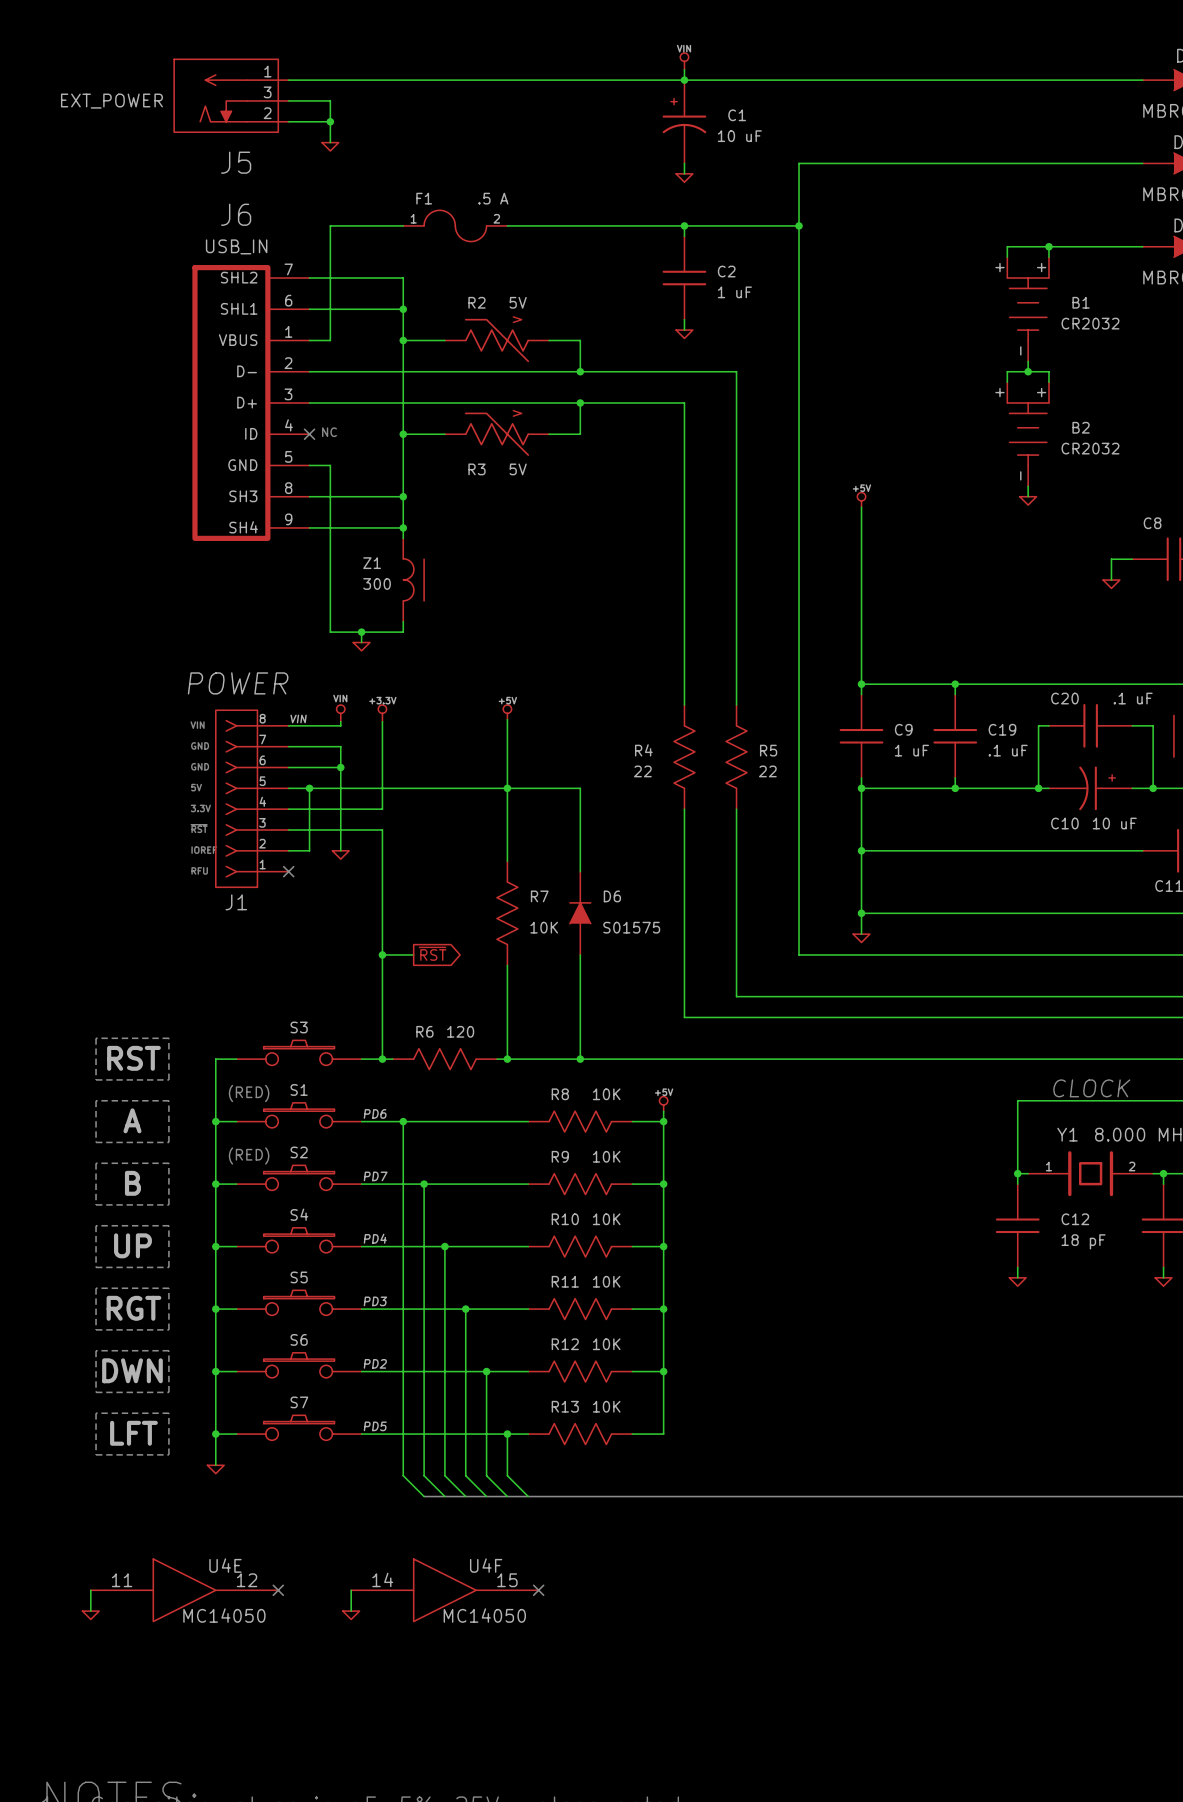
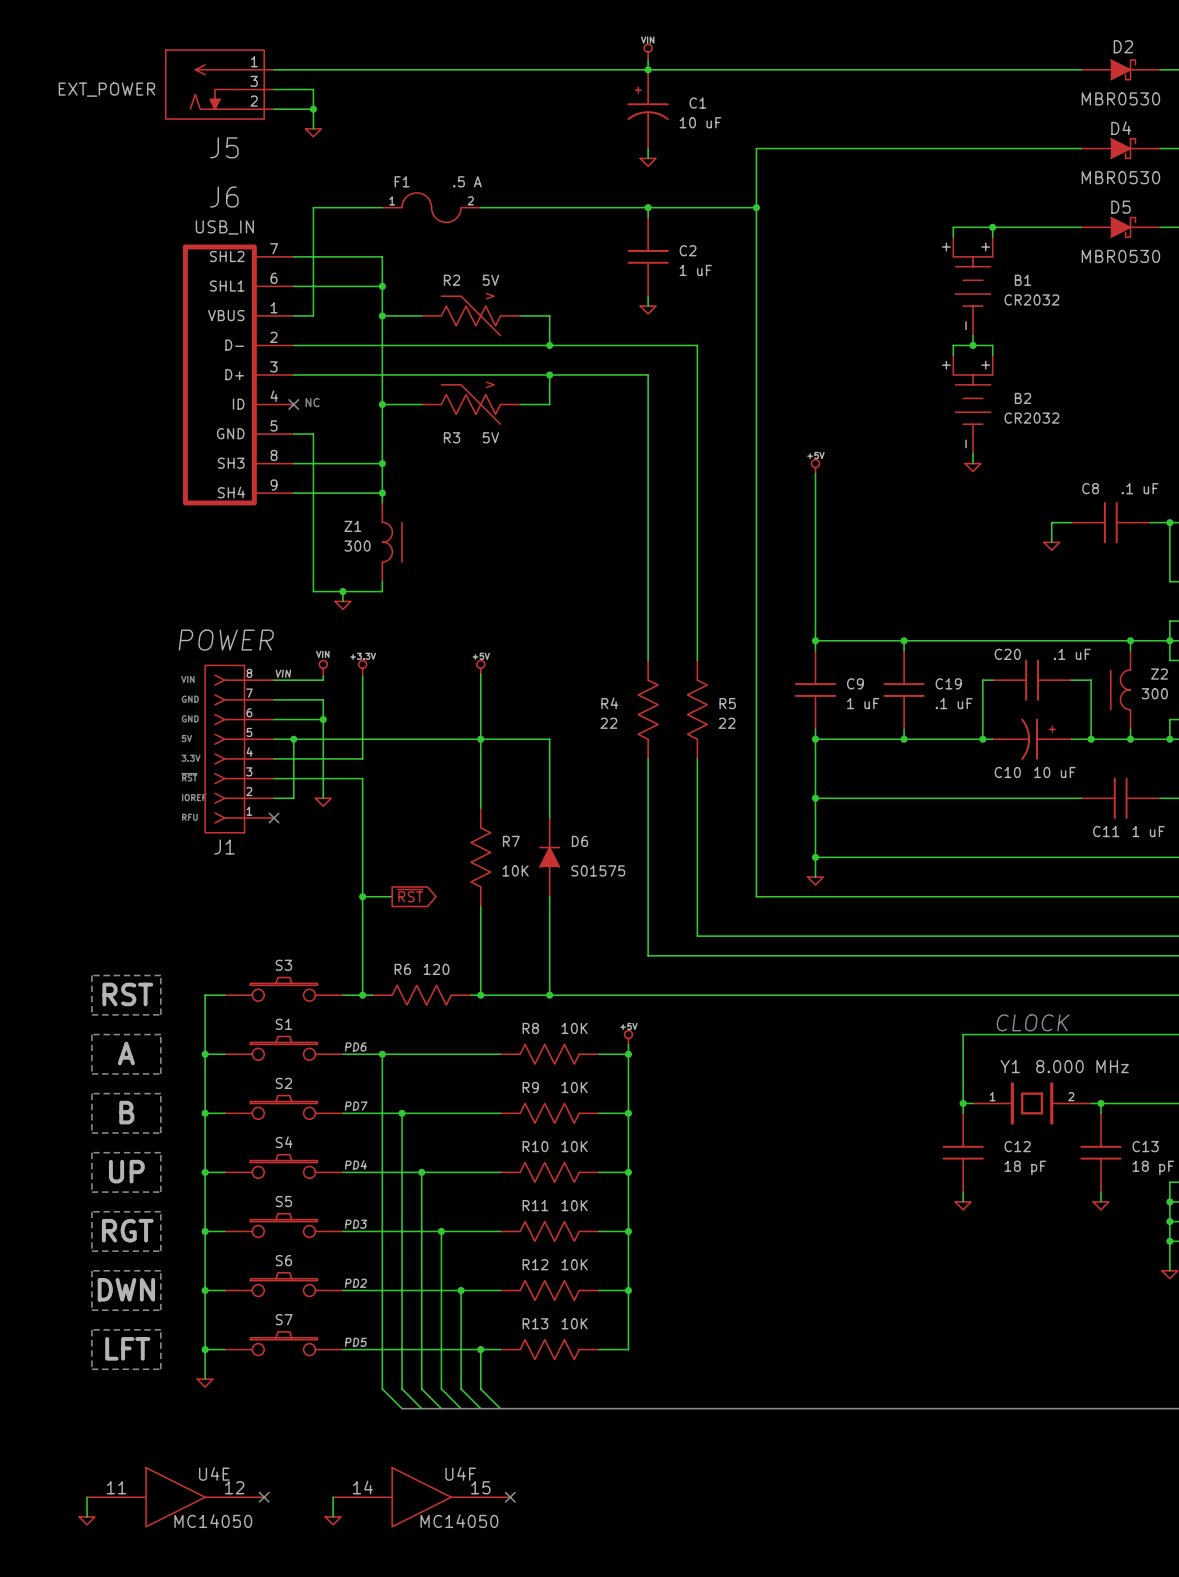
text: (RED) (249, 1093) -> none
text: (RED) (249, 1155) -> none

